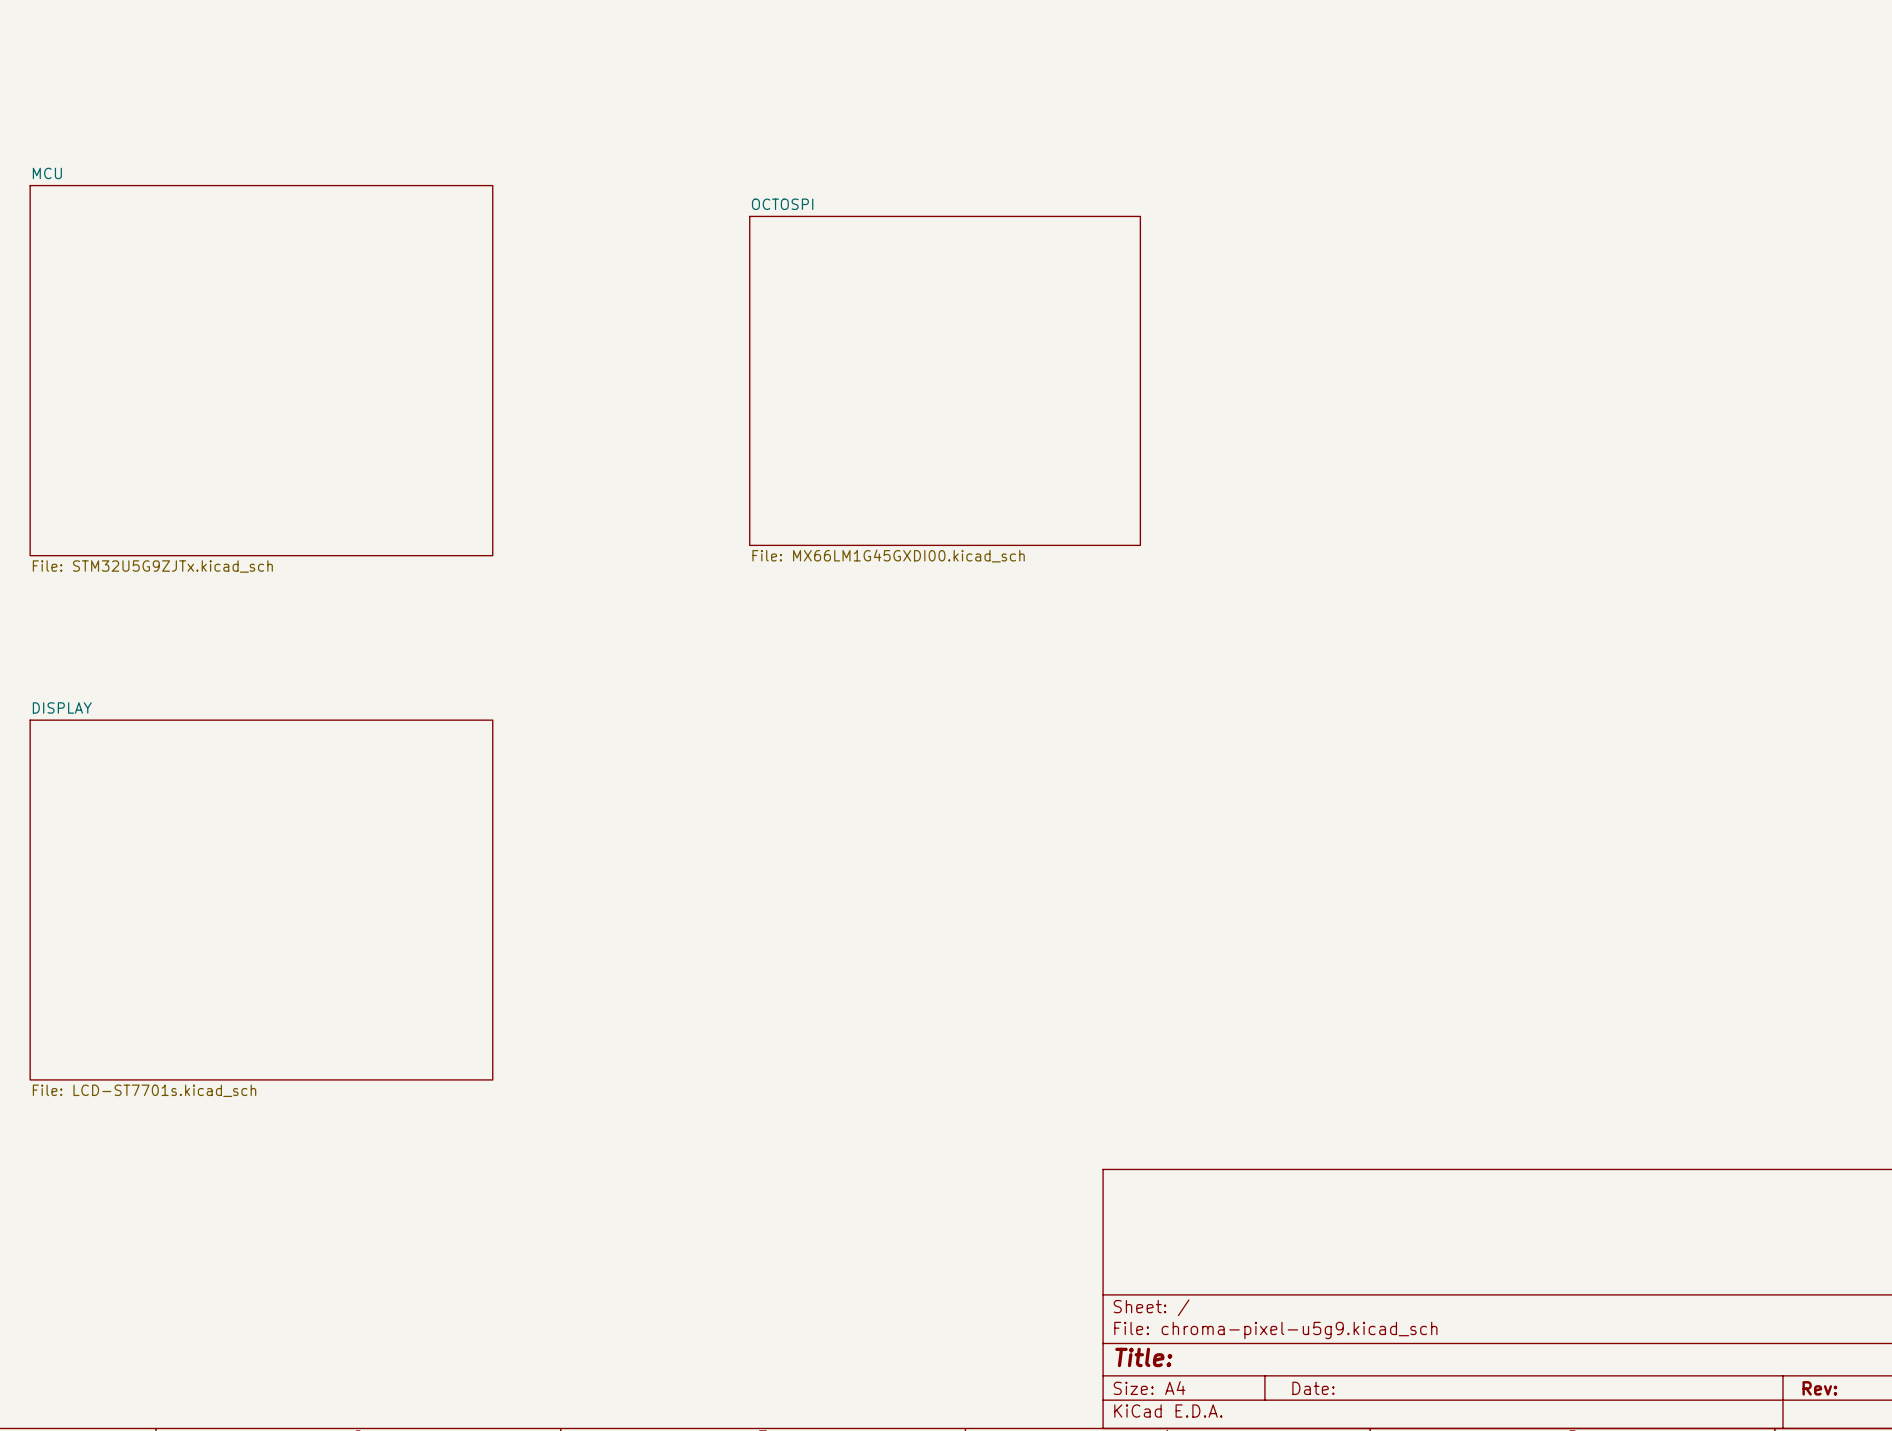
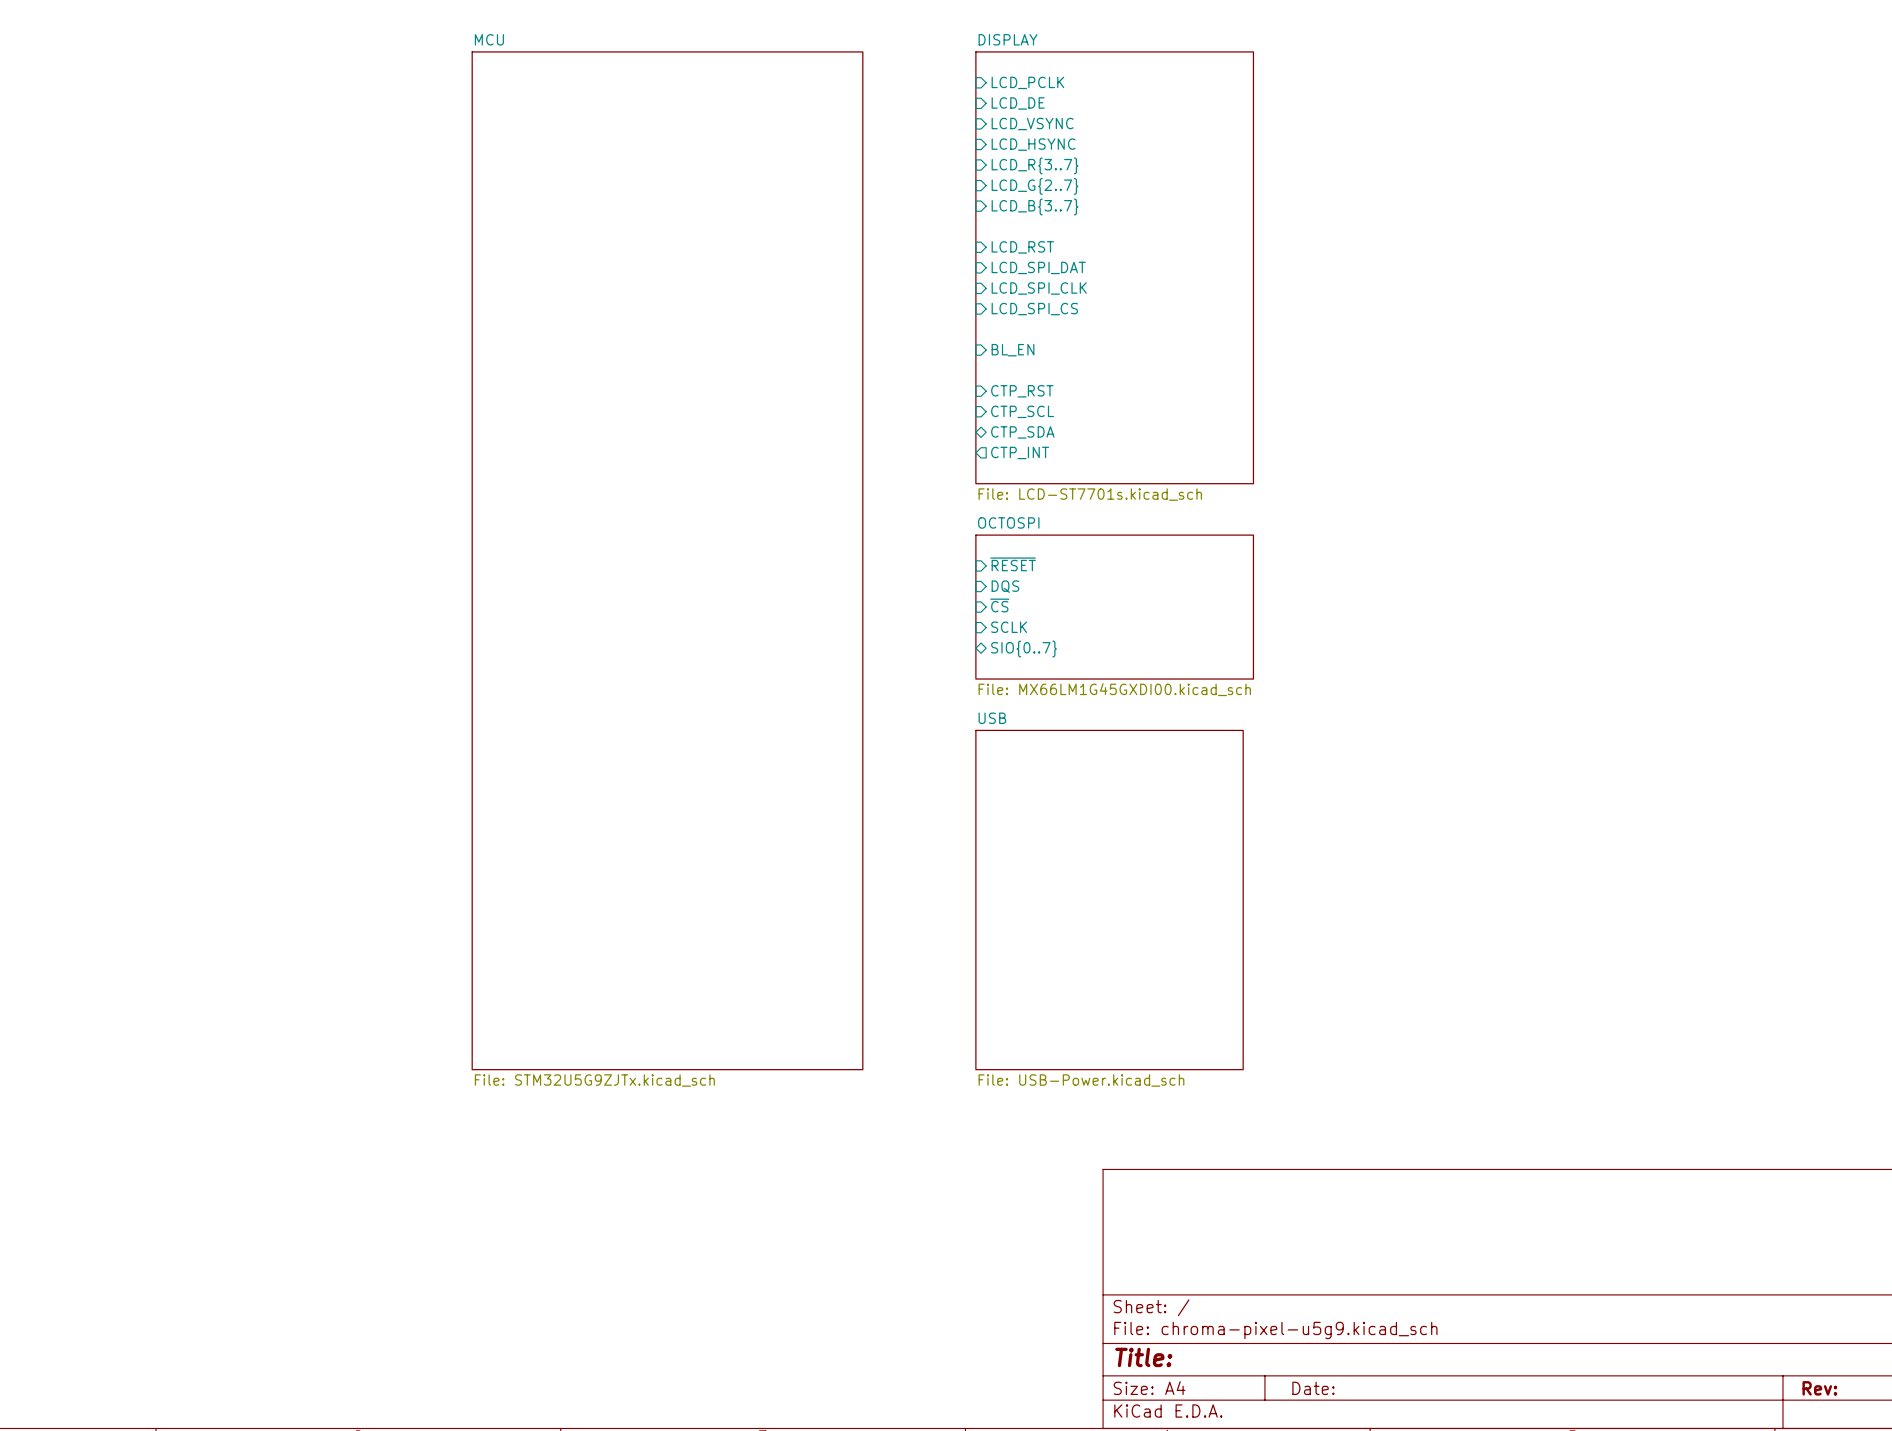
sheet pin: none -> LCD_PCLK (1027, 82)
sheet pin: none -> LCD_DE (1018, 103)
sheet pin: none -> LCD_VSYNC (1032, 124)
sheet pin: none -> LCD_HSYNC (1033, 144)
sheet pin: none -> LCD_R{3..7} (1035, 165)
sheet pin: none -> LCD_G{2..7} (1035, 186)
sheet pin: none -> LCD_B{3..7} (1035, 206)
sheet pin: none -> LCD_RST (1022, 247)
sheet pin: none -> LCD_SPI_DAT (1038, 267)
sheet DISPLAY: none -> File: LCD-ST7701s.kicad_sch (1114, 267)
sheet pin: none -> LCD_SPI_CLK (1039, 288)
sheet pin: none -> LCD_SPI_CS (1034, 309)
sheet pin: none -> BL_EN (1013, 350)
sheet MCU: File: STM32U5G9ZJTx.kicad_sch (261, 370) -> none
sheet OCTOSPI: File: MX66LM1G45GXDI00.kicad_sch (945, 380) -> none
sheet pin: none -> CTP_RST (1022, 391)
sheet pin: none -> CTP_SCL (1022, 411)
sheet pin: none -> CTP_SDA (1022, 432)
sheet pin: none -> CTP_INT (1020, 452)
sheet MCU: none -> File: STM32U5G9ZJTx.kicad_sch (667, 560)
sheet pin: none -> ~{RESET} (1013, 564)
sheet pin: none -> DQS (1005, 586)
sheet pin: none -> ~{CS} (999, 605)
sheet OCTOSPI: none -> File: MX66LM1G45GXDI00.kicad_sch (1114, 607)
sheet pin: none -> SCLK (1009, 627)
sheet pin: none -> SIO{0..7} (1024, 649)
sheet DISPLAY: File: LCD-ST7701s.kicad_sch (261, 900) -> none
sheet USB: none -> File: USB-Power.kicad_sch (1109, 900)

